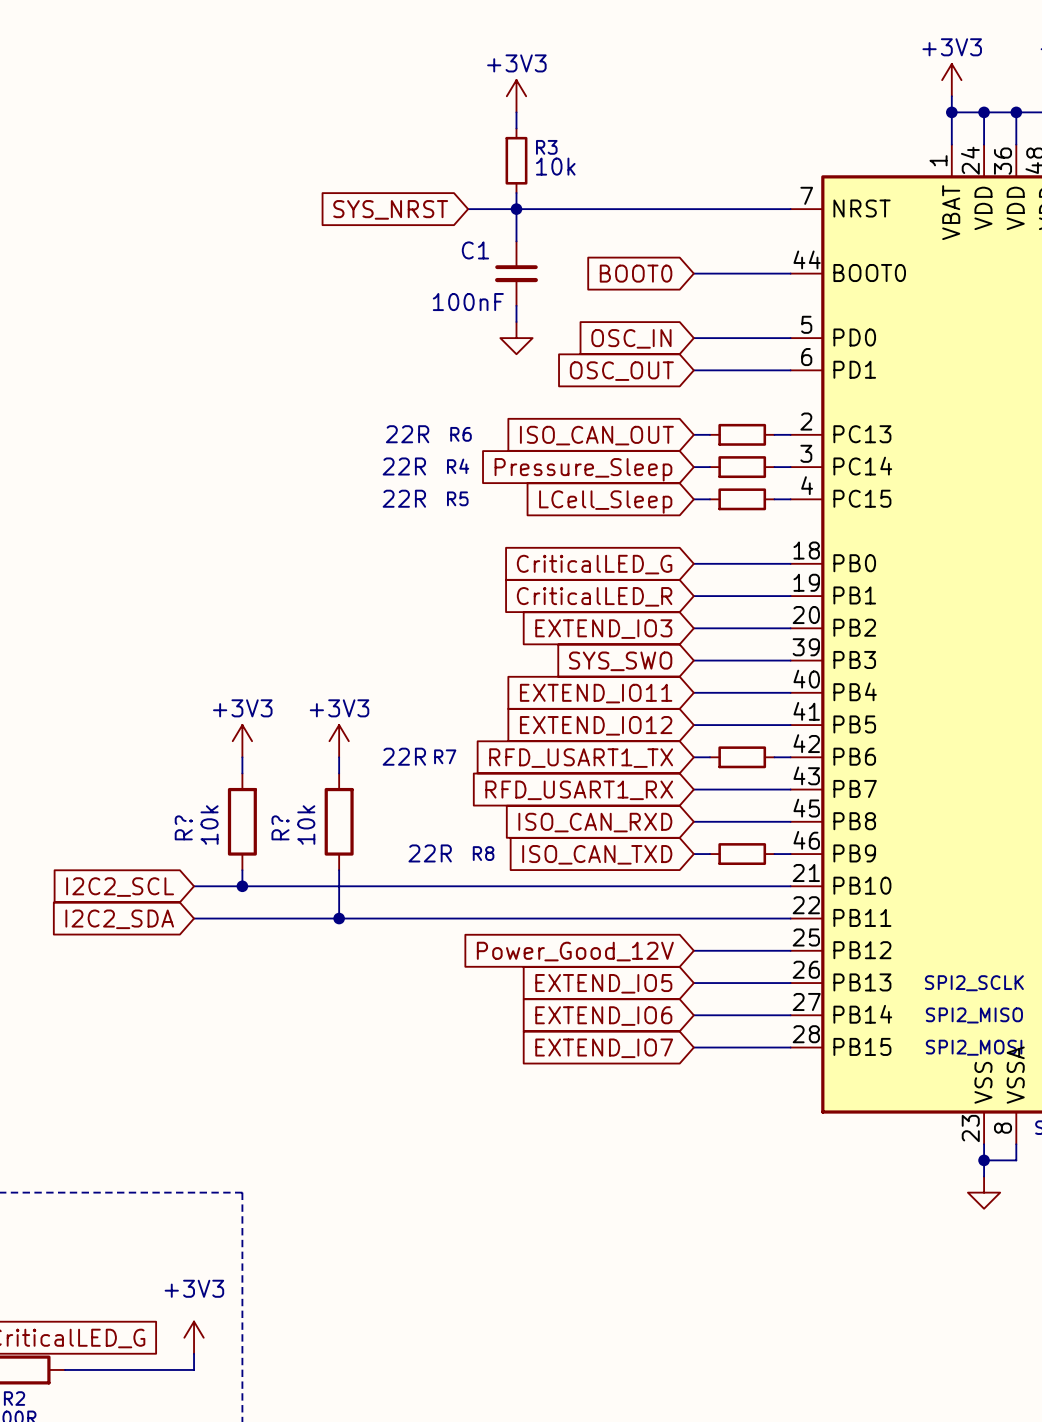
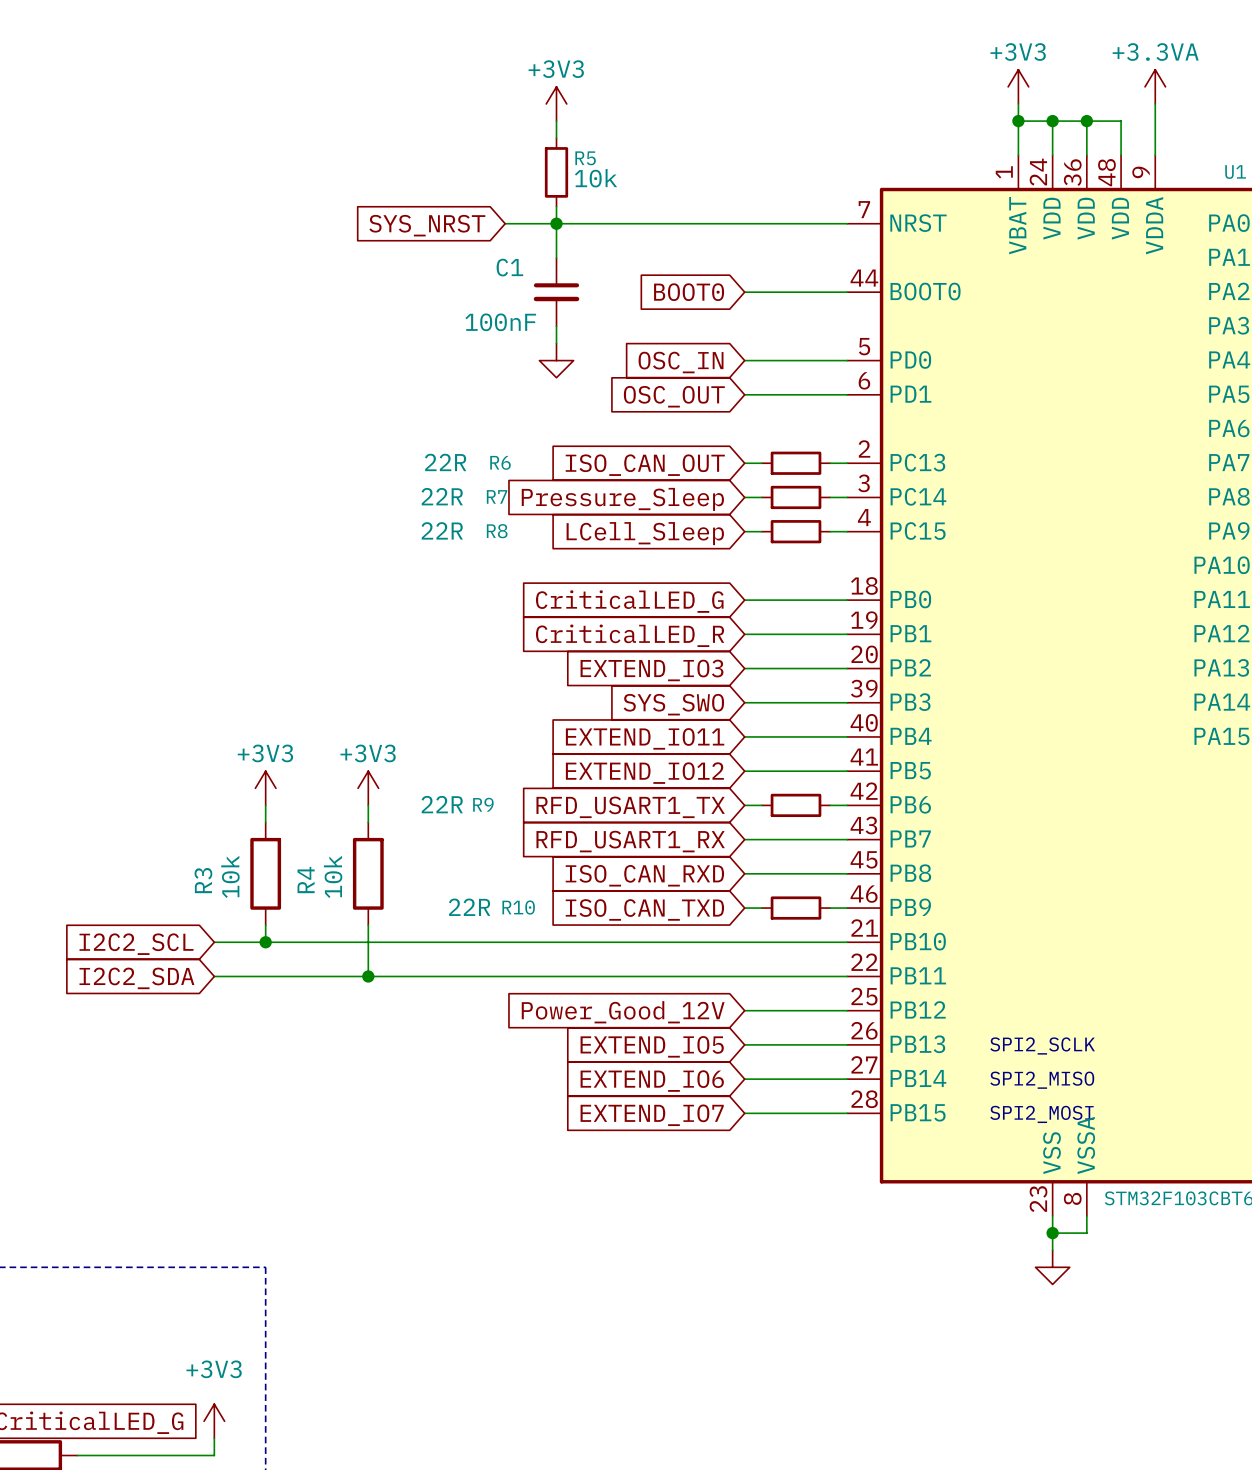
R3 name: R3 (546, 147) -> R5 (585, 158)
R4 name: R4 (458, 466) -> R7 (497, 496)
R5 name: R5 (457, 498) -> R8 (497, 531)
R7 name: R7 (445, 756) -> R9 (483, 804)
R? name: R? (183, 827) -> R3 (203, 880)
R? name: R? (280, 827) -> R4 (306, 880)
R8 name: R8 (483, 853) -> R10 (518, 907)

